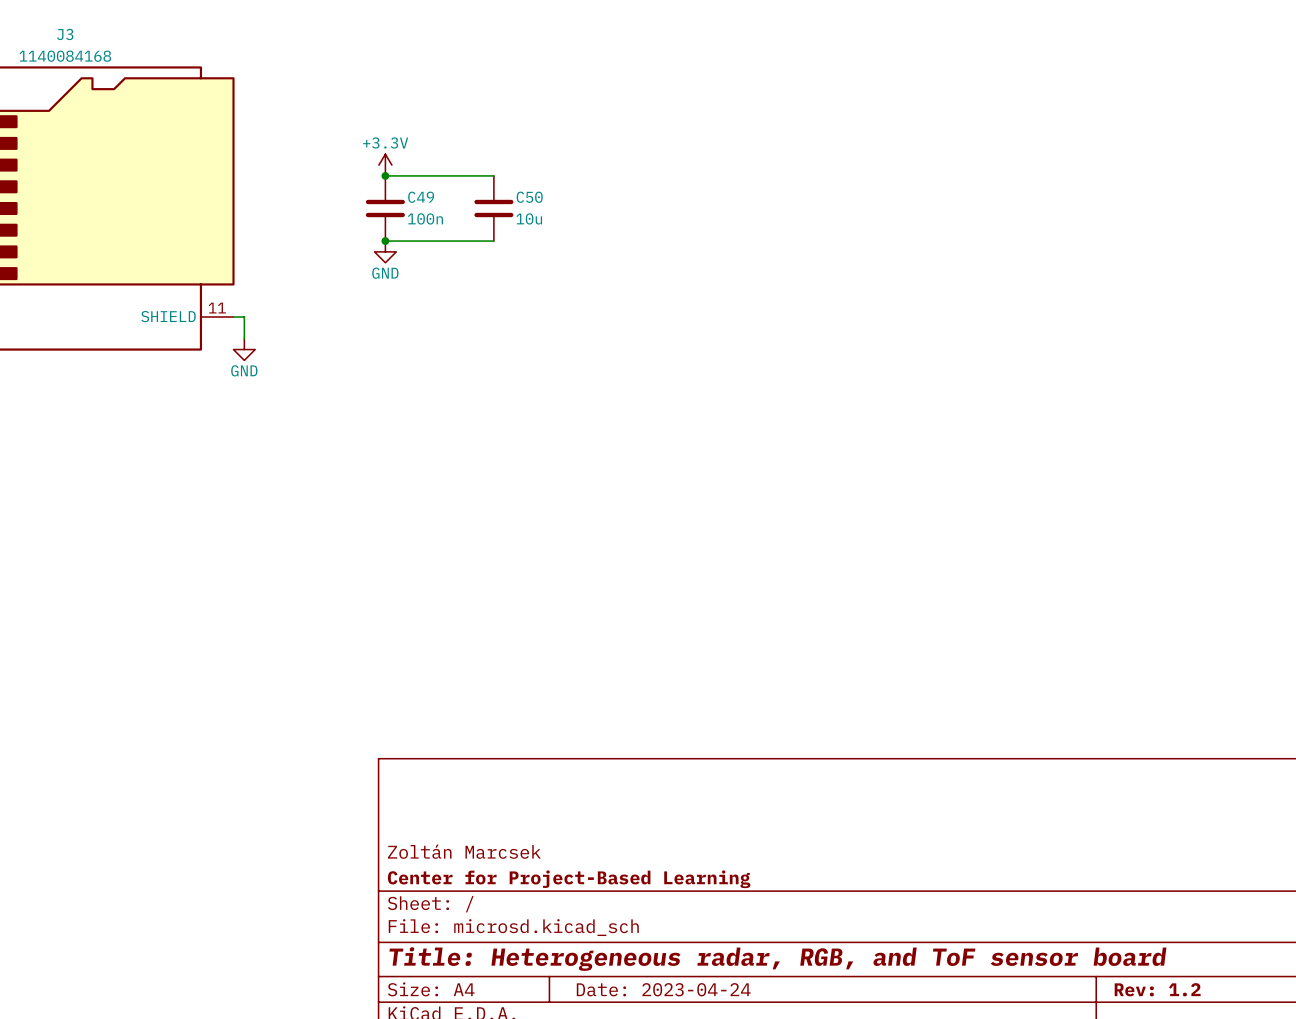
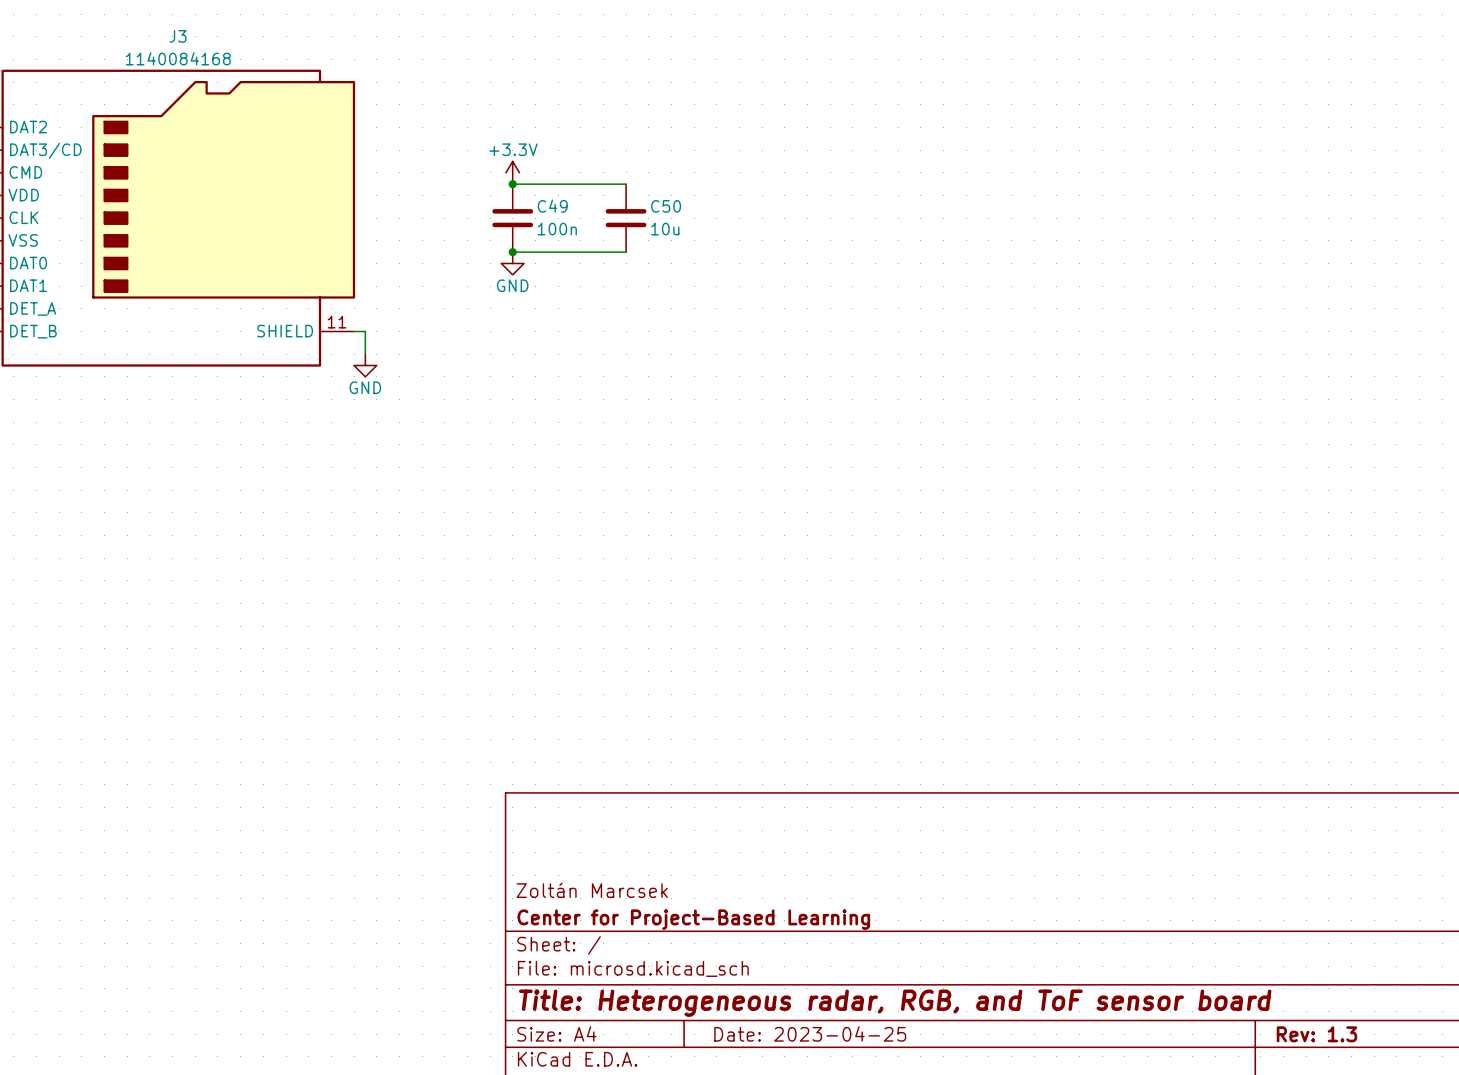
title block: Date: 2023-04-24 (663, 989) -> Date: 2023-04-25 (810, 1033)
title block: Rev: 1.2 (1157, 989) -> Rev: 1.3 (1316, 1034)

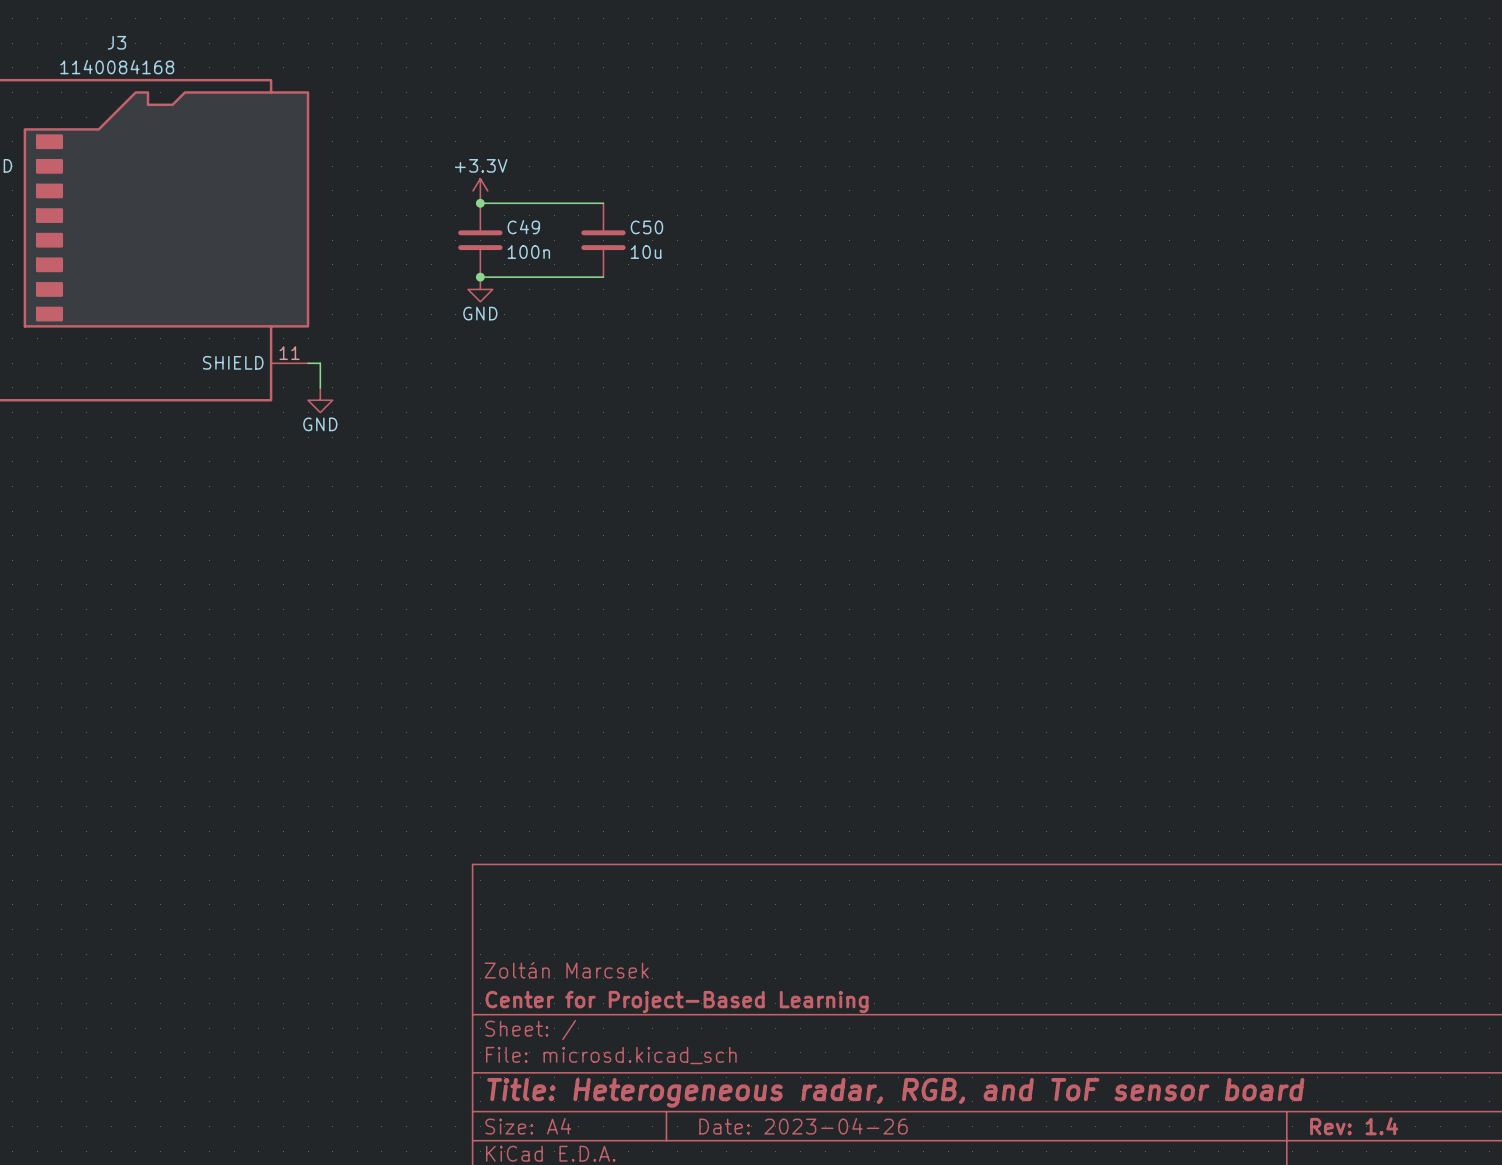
title block: Date: 2023-04-25 (810, 1033) -> Date: 2023-04-26 (803, 1126)
title block: Rev: 1.3 (1316, 1034) -> Rev: 1.4 (1354, 1126)

